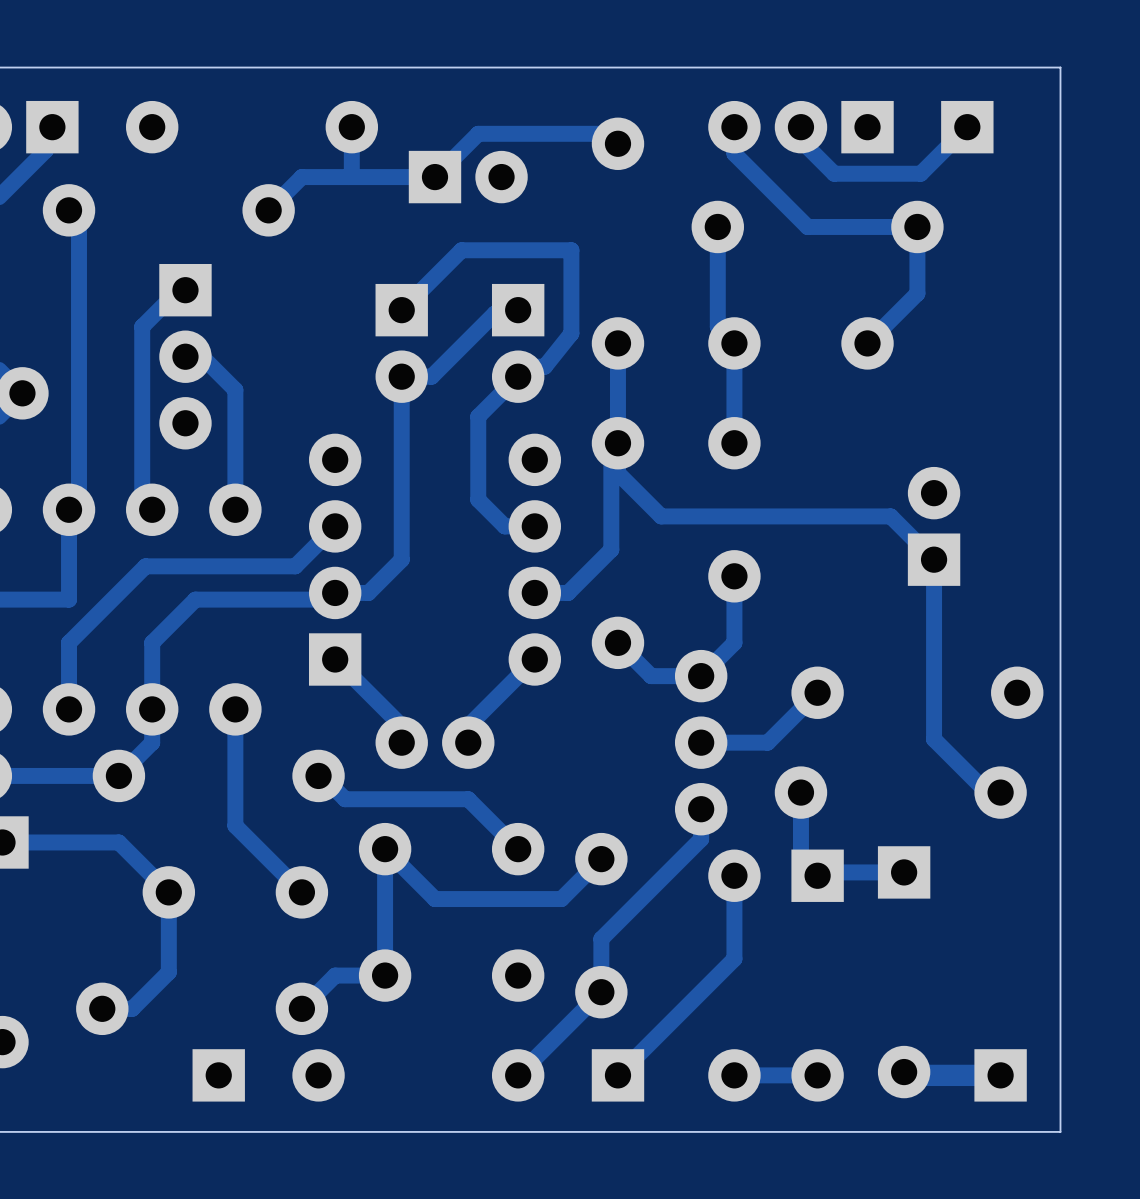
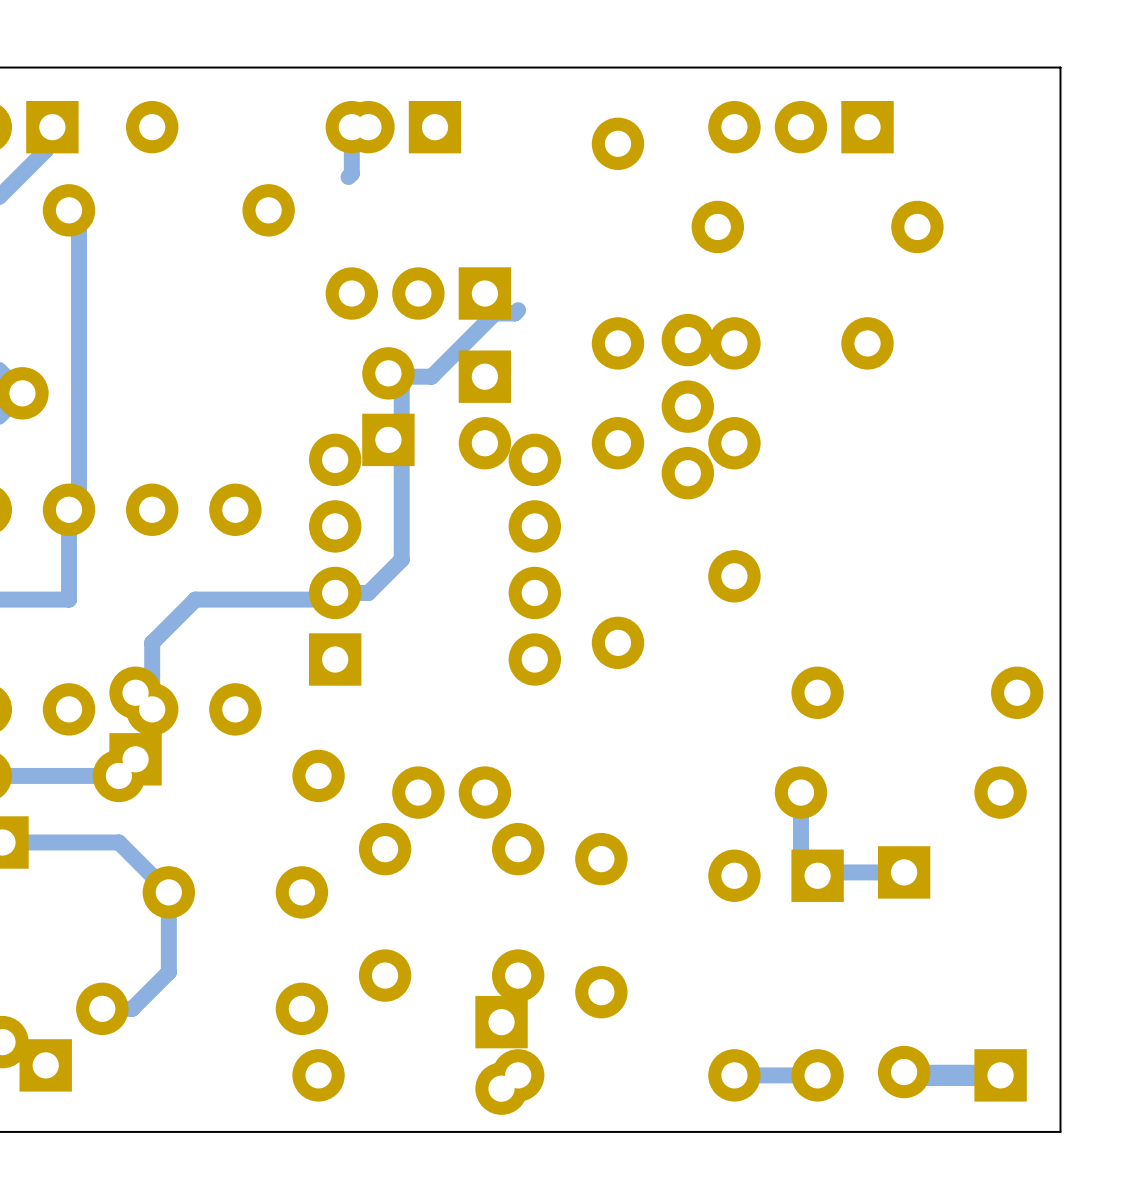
track: (734, 127) (734, 153) (807, 226) (917, 226) (917, 293) (867, 343) -> none
track: (967, 127) (920, 173) (834, 173) (800, 140) (800, 127) -> none
part: (967, 127) -> none
track: (617, 137) (617, 143) (608, 133) (478, 133) (435, 177) (301, 177) (268, 210) -> none
part rotation: 0° (468, 177) -> 180° (401, 127)
part position: (468, 177) -> (401, 127)
track: (717, 226) (717, 326) (734, 343) (734, 443) -> none
track: (185, 290) (178, 290) (142, 326) (142, 499) (152, 509) -> none
track: (401, 310) (461, 250) (571, 250) (571, 333) (544, 366) (528, 366) (478, 416) (478, 499) (504, 526) (534, 526) -> none
part: (401, 343) -> none
part: (518, 343) -> none
track: (617, 343) (617, 473) (661, 516) (890, 516) (934, 559) (934, 739) (987, 792) (1000, 792) -> none
track: (188, 353) (185, 356) (202, 356) (235, 390) (235, 509) -> none
part rotation: 0° (185, 356) -> 90° clockwise (418, 293)
part position: (185, 356) -> (418, 293)
part: none -> (388, 406)
part: none -> (484, 409)
track: (617, 443) (611, 449) (611, 549) (568, 592) (534, 592) -> none
track: (335, 526) (295, 566) (145, 566) (69, 642) (69, 709) -> none
part: (934, 526) -> none
track: (734, 576) (734, 642) (701, 676) (651, 676) (617, 642) -> none
track: (335, 659) (401, 726) (401, 742) -> none
track: (534, 659) (468, 726) (468, 742) -> none
track: (817, 692) (767, 742) (701, 742) -> none
track: (235, 709) (235, 825) (301, 892) -> none
part: none -> (135, 726)
part position: (435, 742) -> (451, 792)
part position: (701, 742) -> (687, 406)
track: (318, 775) (321, 775) (345, 799) (468, 799) (518, 849) -> none
track: (701, 809) (701, 839) (601, 938) (601, 992) (518, 1075) -> none
track: (601, 859) (561, 899) (435, 899) (385, 849) (385, 975) (335, 975) (301, 1008) -> none
track: (734, 875) (734, 958) (617, 1075) -> none
part: none -> (501, 1055)
part: none -> (45, 1065)
part: (218, 1075) -> none
part: (617, 1075) -> none

